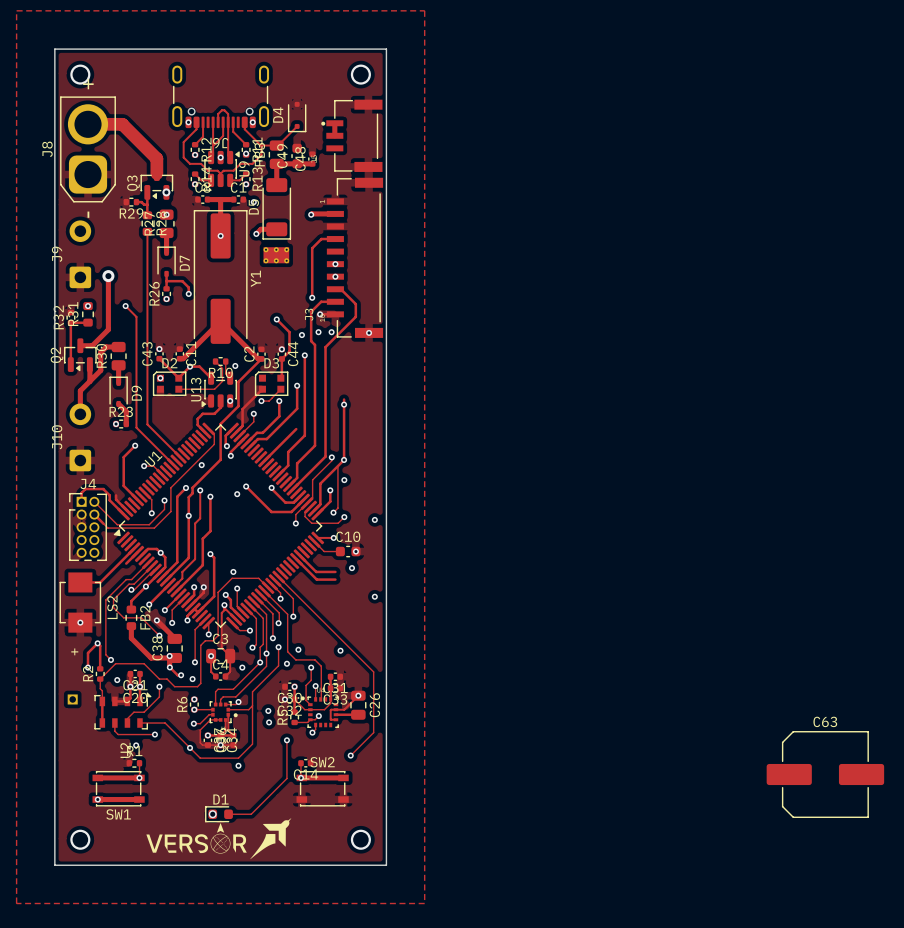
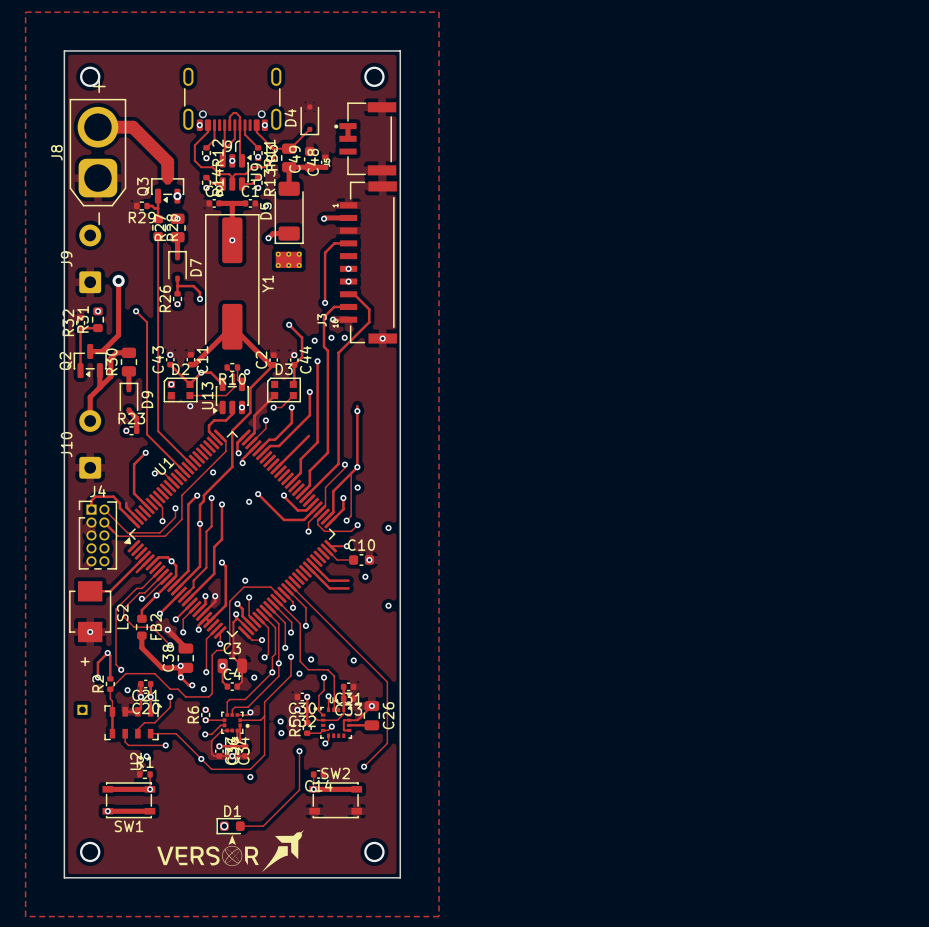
via: none -> (190, 406)
C63: (825, 774) -> none

